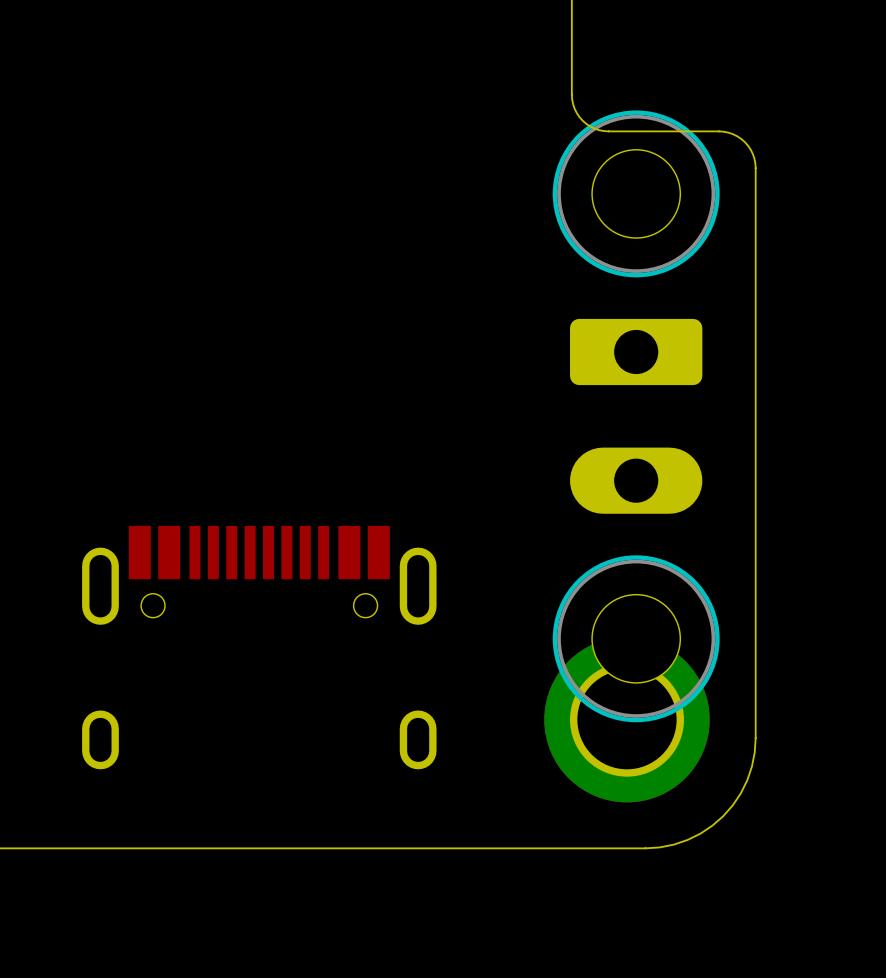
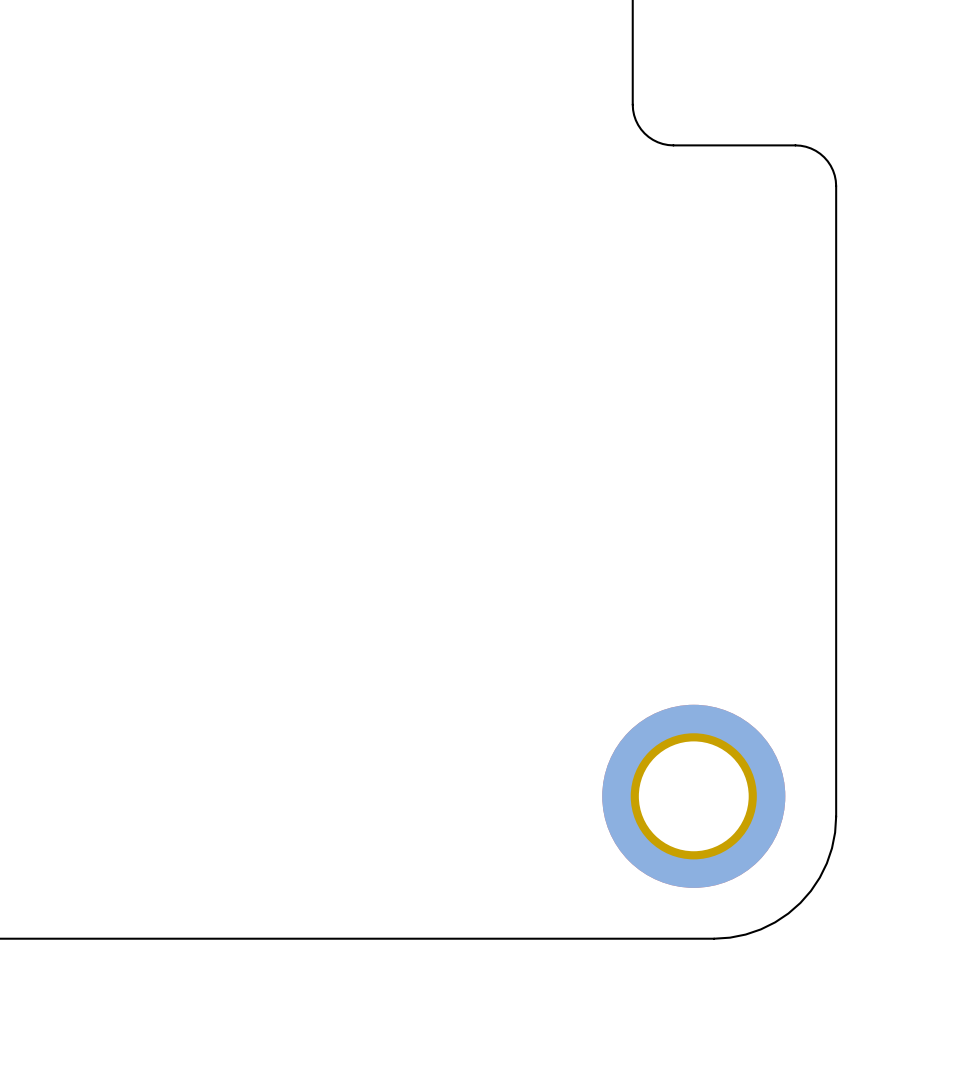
part: (636, 416) -> none
part: (259, 647) -> none

